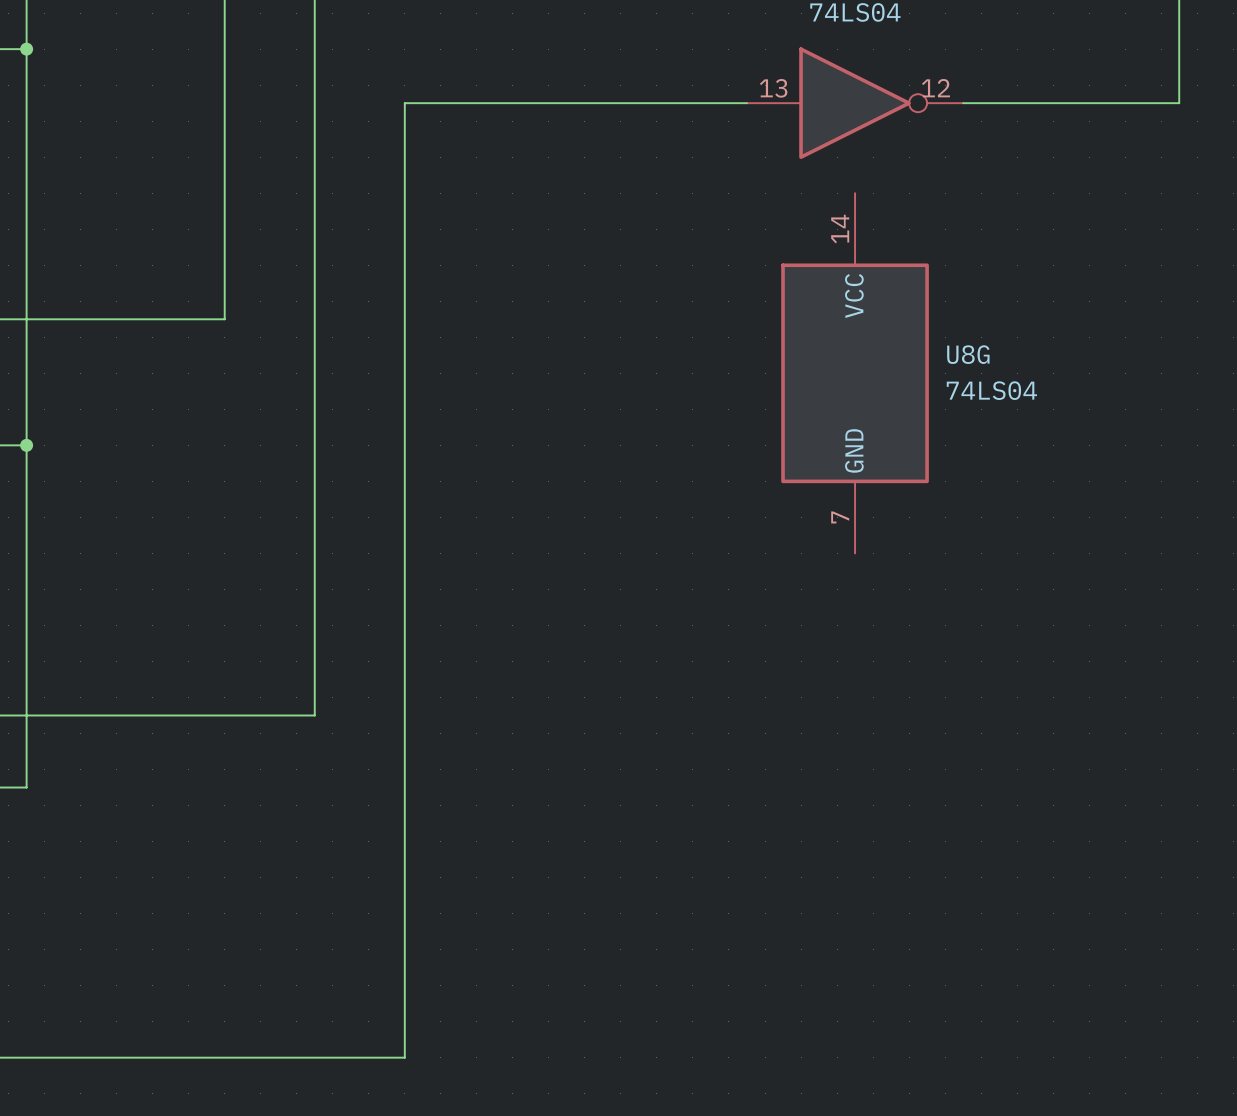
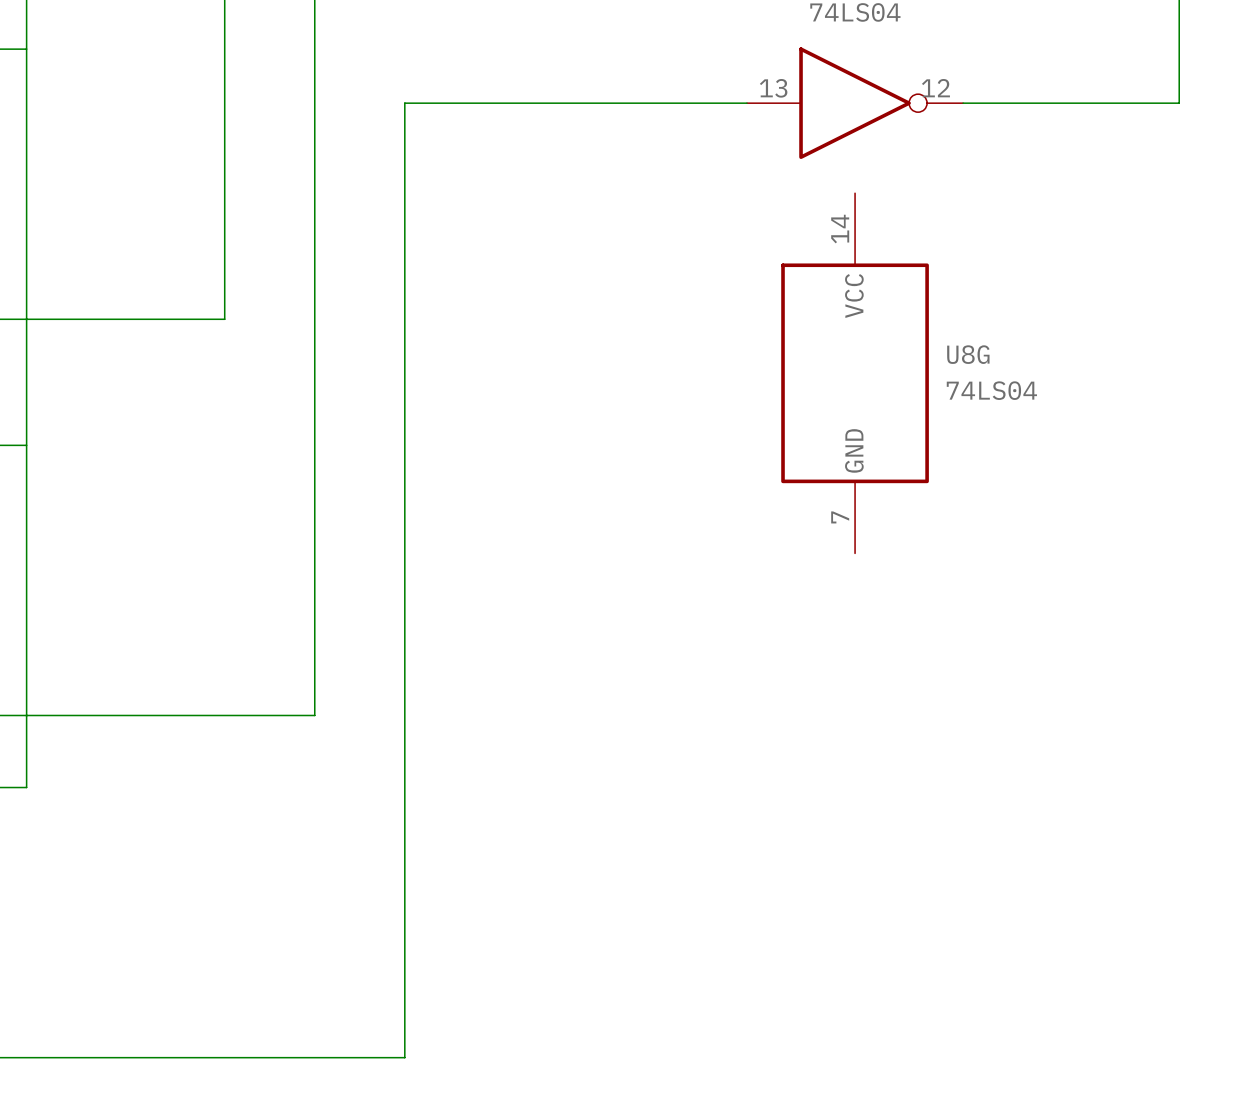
junction: (26, 49) -> none
junction: (26, 445) -> none

